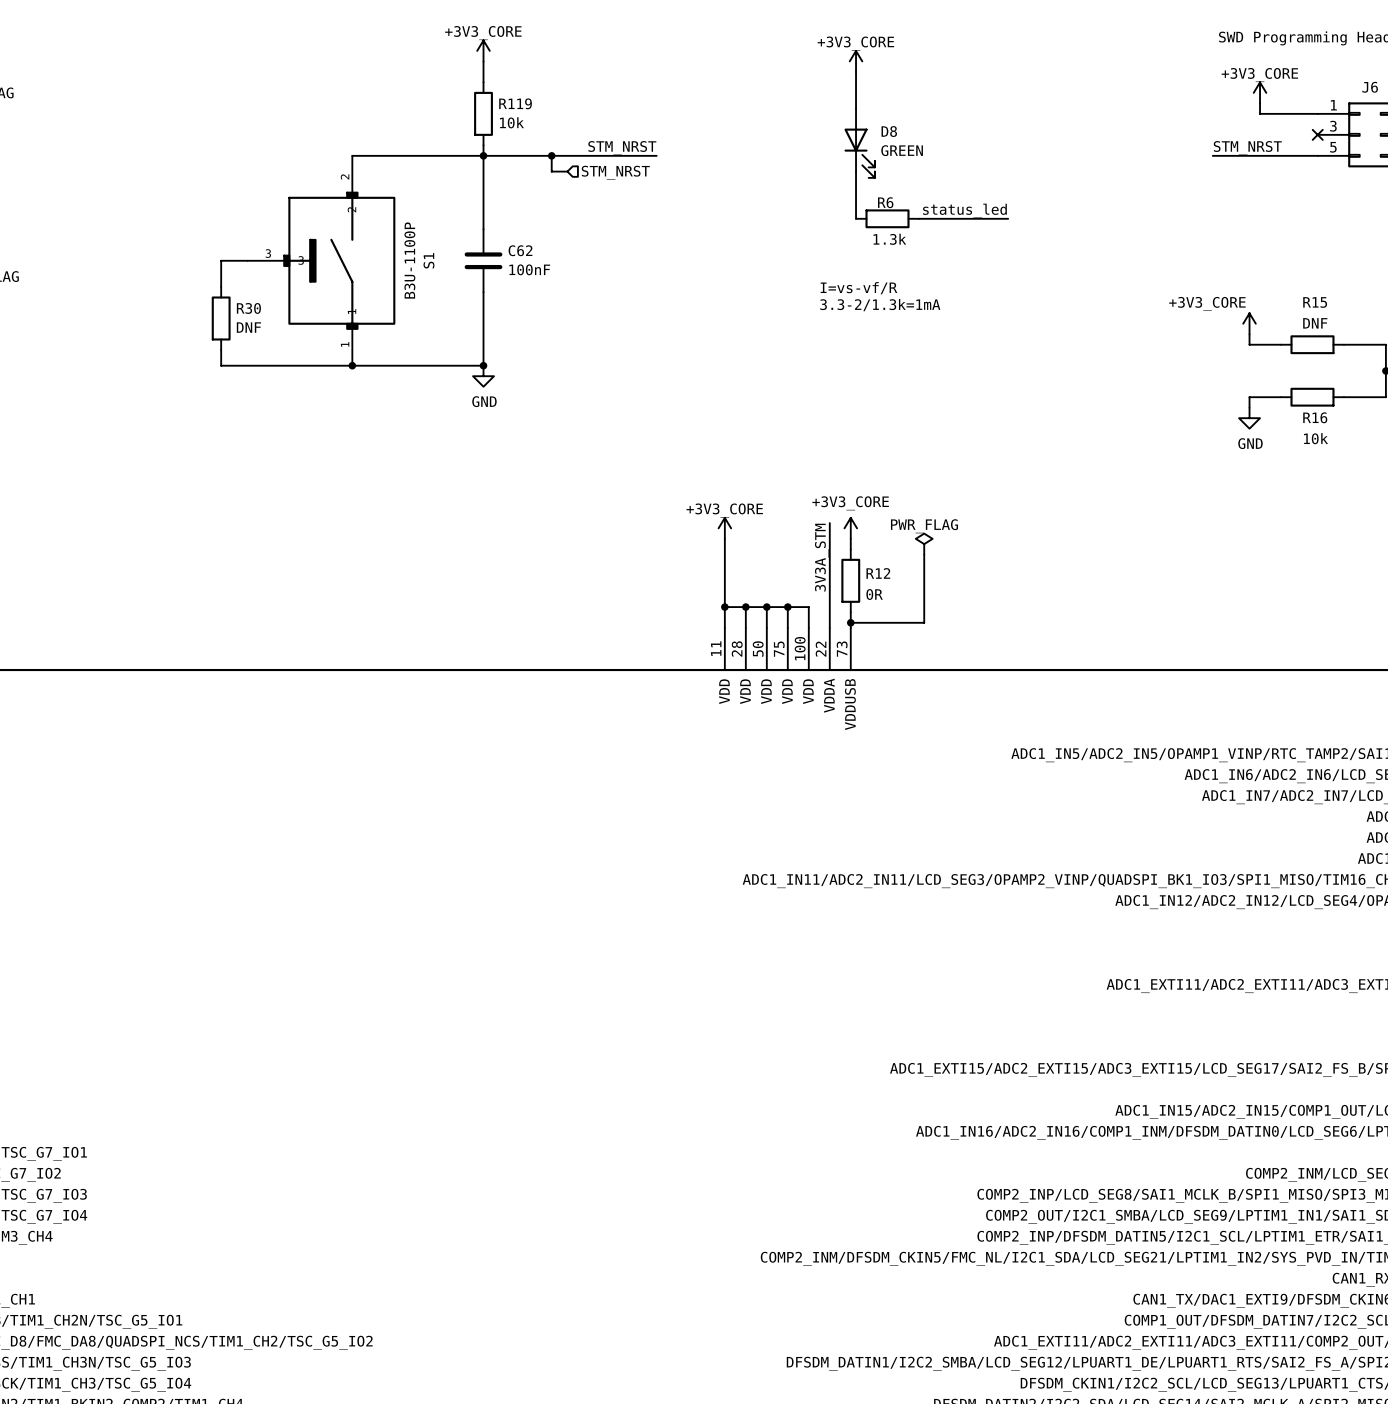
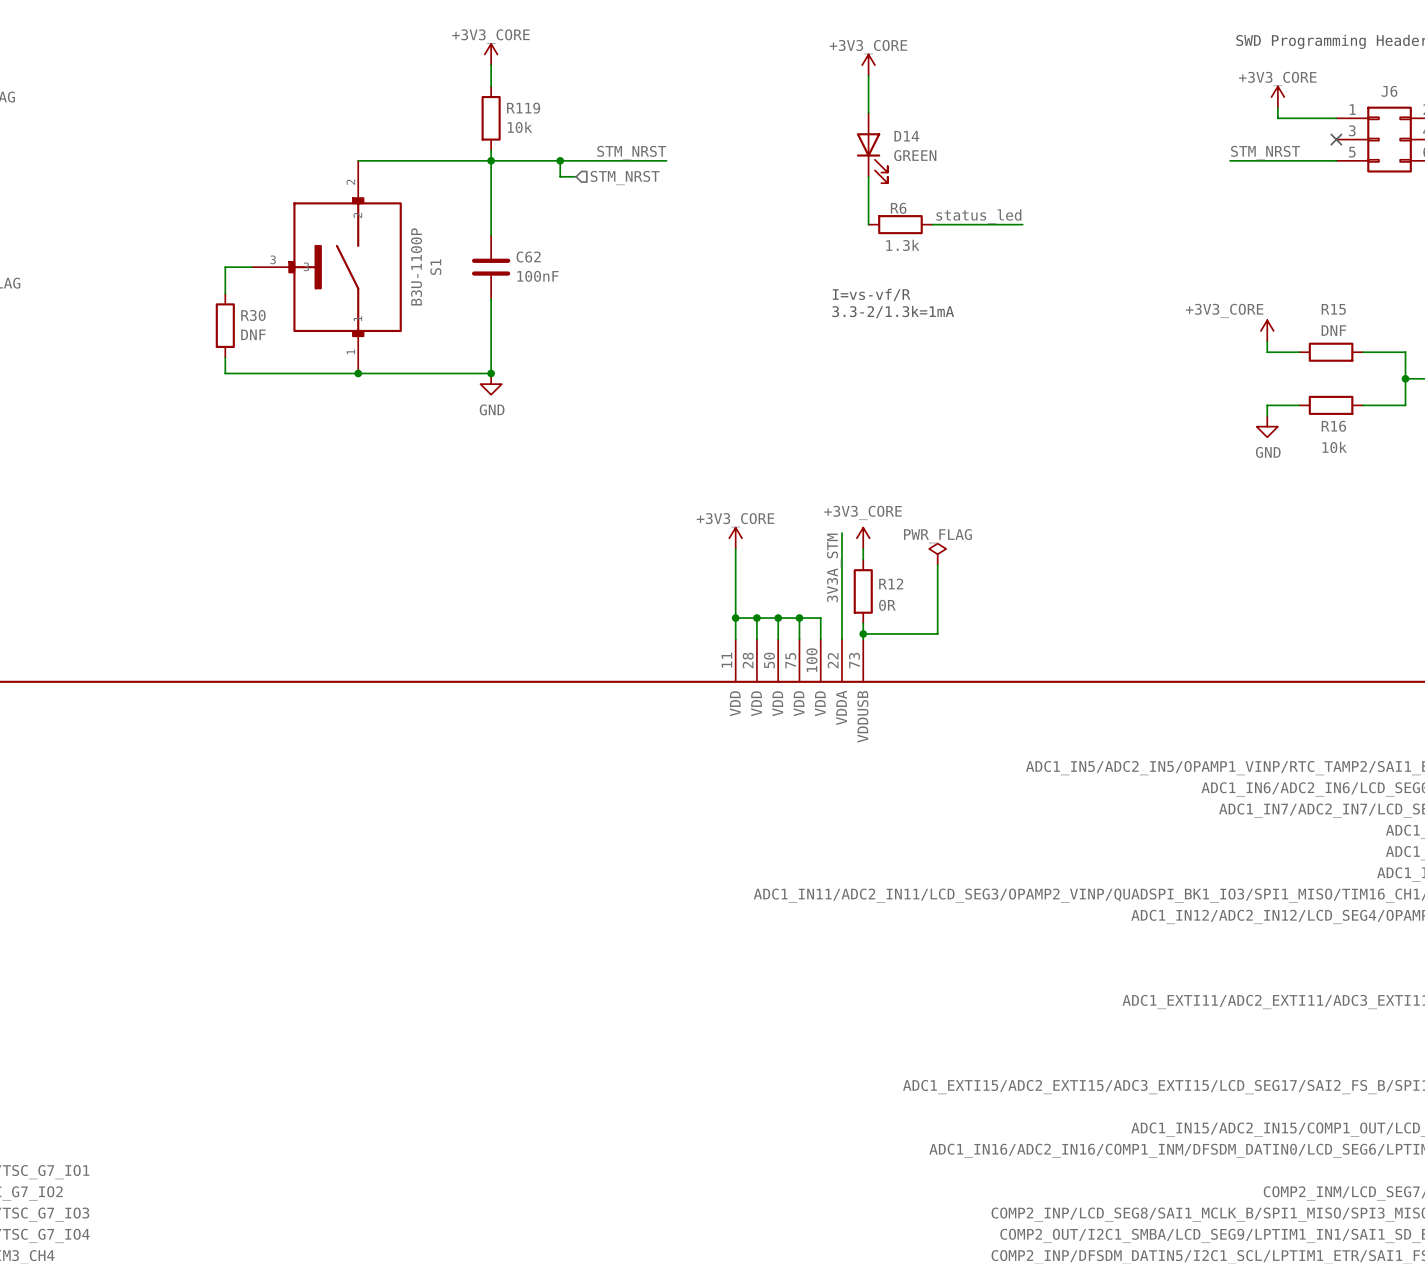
D8 name: D8 (889, 131) -> D14 (906, 136)

